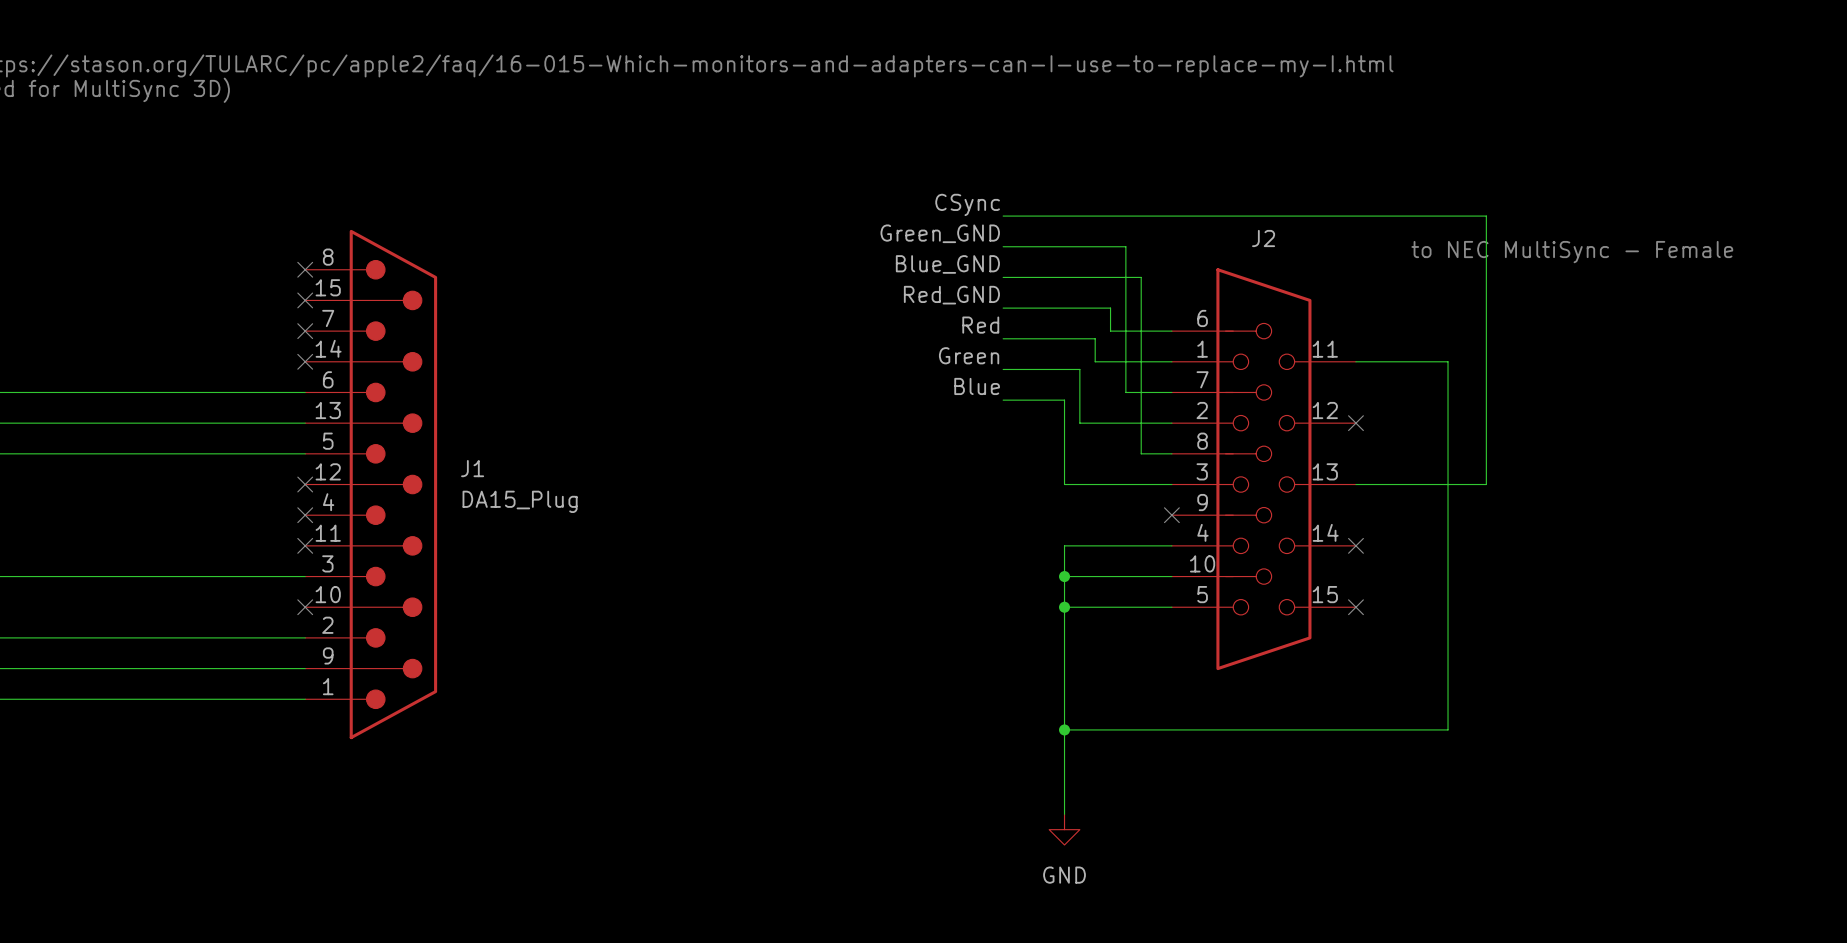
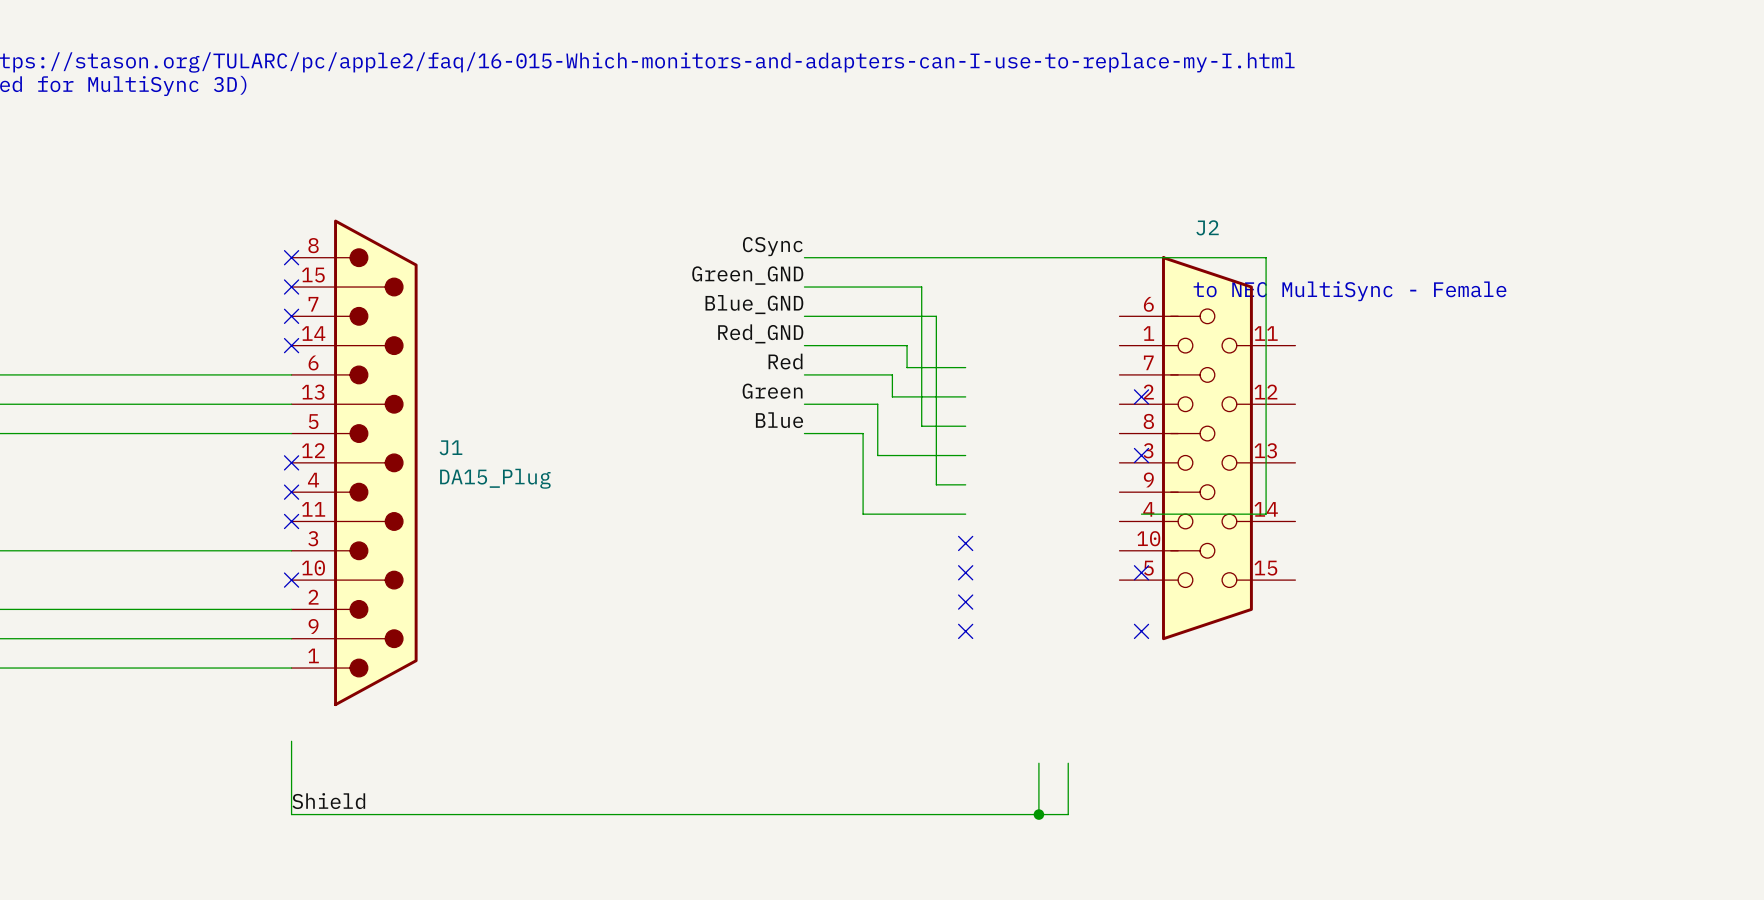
label position: CSync (967, 204) -> CSync (772, 246)
wire: (1003, 216) (1486, 216) (1486, 484) (1355, 484) -> (804, 257) (1266, 257) (1266, 514) (1141, 514)
label position: Green_GND (940, 233) -> Green_GND (747, 275)
wire: (1003, 246) (1125, 246) (1125, 392) (1171, 392) -> (804, 287) (921, 287) (921, 426) (965, 426)
text position: to NEC MultiSync - Female (1572, 252) -> to NEC MultiSync - Female (1349, 291)
label position: Blue_GND (947, 264) -> Blue_GND (754, 304)
wire: (1003, 277) (1141, 277) (1141, 453) (1171, 453) -> (804, 316) (936, 316) (936, 484) (965, 484)
label position: Red_GND (951, 295) -> Red_GND (760, 333)
wire: (1003, 308) (1110, 308) (1110, 331) (1171, 331) -> (804, 345) (907, 345) (907, 367) (965, 367)
label position: Red (980, 325) -> Red (785, 361)
wire: (1003, 338) (1095, 338) (1095, 361) (1171, 361) -> (804, 374) (892, 374) (892, 396) (965, 396)
label position: Green (969, 355) -> Green (772, 391)
wire: (1355, 361) (1448, 361) (1448, 729) (1064, 729) -> none
wire: (1003, 369) (1079, 369) (1079, 423) (1171, 423) -> (804, 404) (877, 404) (877, 455) (965, 455)
label position: Blue (977, 386) -> Blue (779, 420)
wire: (1003, 400) (1064, 400) (1064, 484) (1171, 484) -> (804, 433) (863, 433) (863, 514) (965, 514)
no-connect mark: none -> (1141, 396)
no-connect mark: (1355, 423) -> none
no-connect mark: none -> (1141, 455)
no-connect mark: (1171, 515) -> none
wire: (1171, 545) (1064, 545) (1064, 814) -> none
no-connect mark: (1355, 545) -> none
no-connect mark: none -> (965, 543)
wire: (1064, 576) (1171, 576) -> none
junction: (1064, 576) -> none
no-connect mark: none -> (965, 572)
no-connect mark: none -> (1141, 572)
wire: (1064, 607) (1171, 607) -> none
junction: (1064, 607) -> none
no-connect mark: (1355, 607) -> none
no-connect mark: none -> (965, 602)
no-connect mark: none -> (965, 631)
no-connect mark: none -> (1141, 631)
junction: (1064, 729) -> none
wire: none -> (291, 741) (291, 814) (1068, 814) (1068, 763)
wire: none -> (1038, 763) (1038, 814)
power symbol: GND (1064, 829) -> none
label: none -> Shield (328, 801)
junction: none -> (1038, 814)

